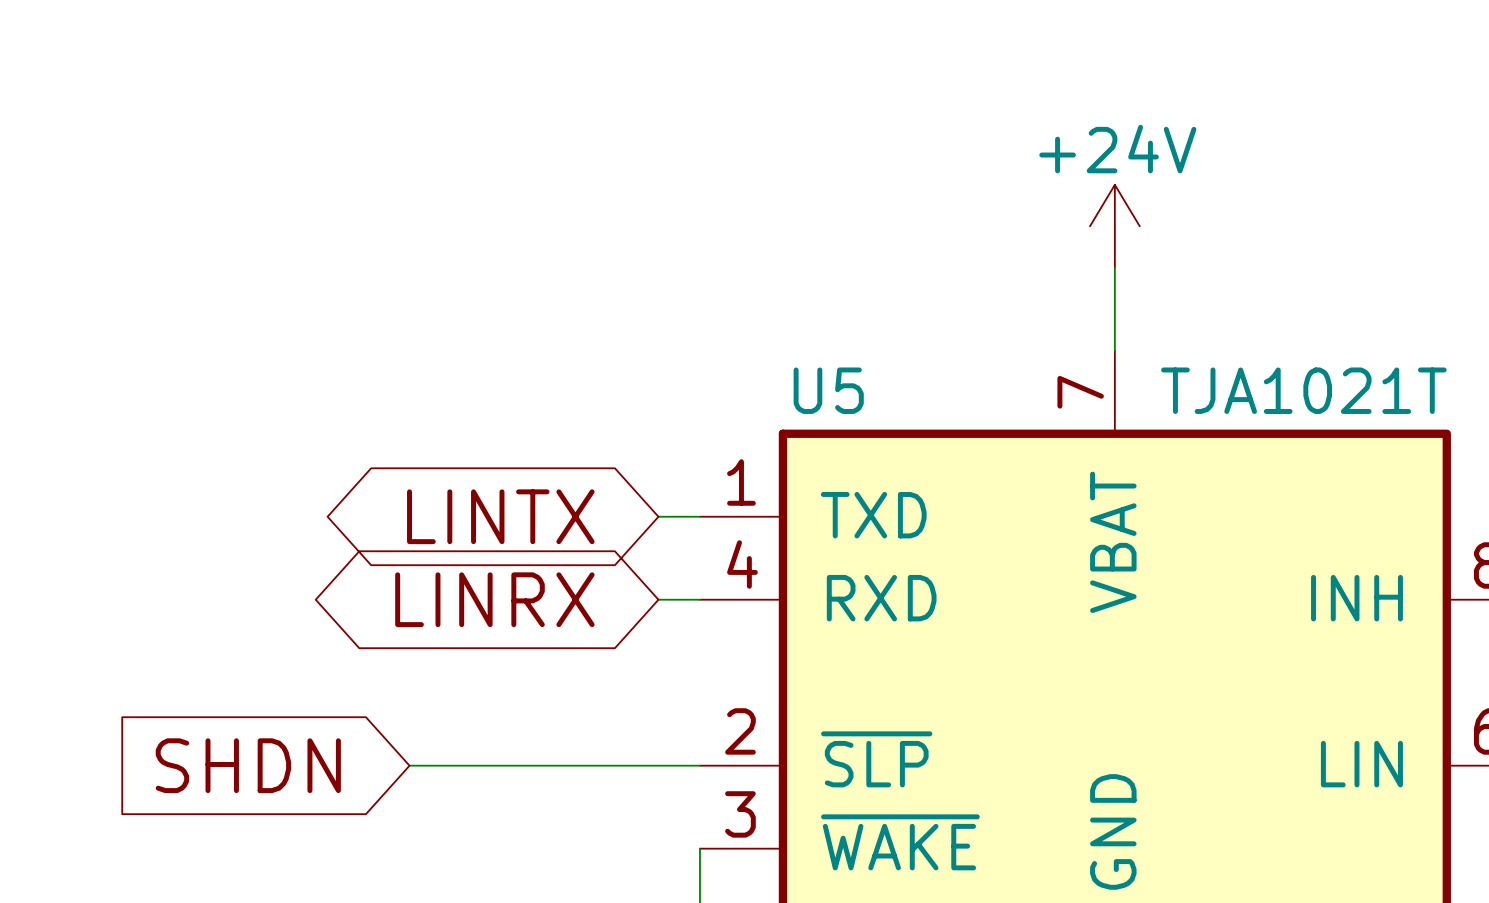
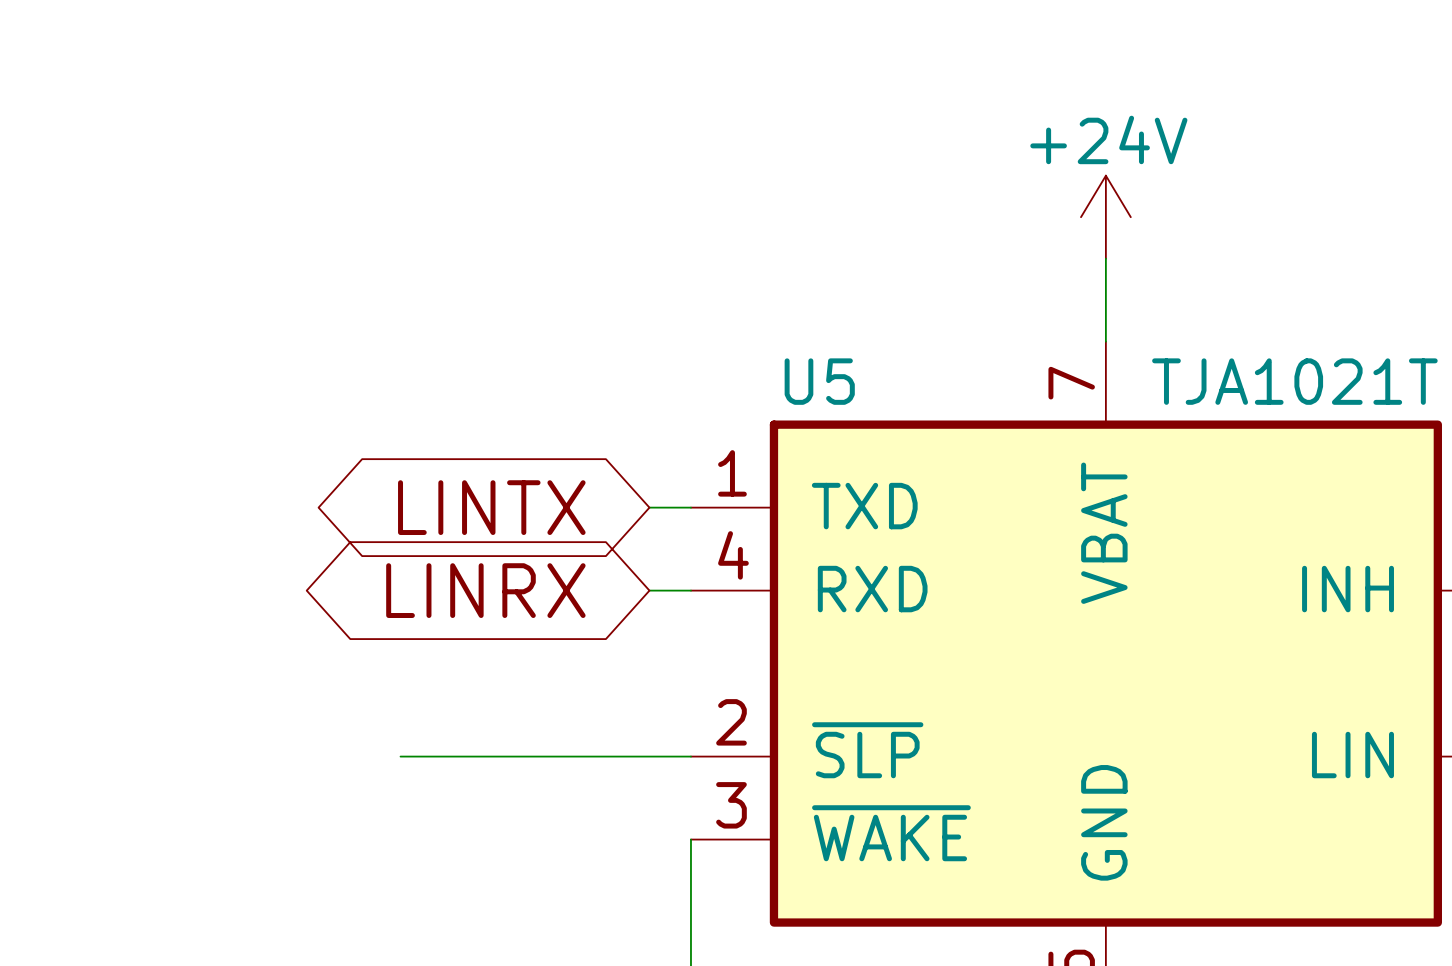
global label: SHDN (248, 765) -> none

